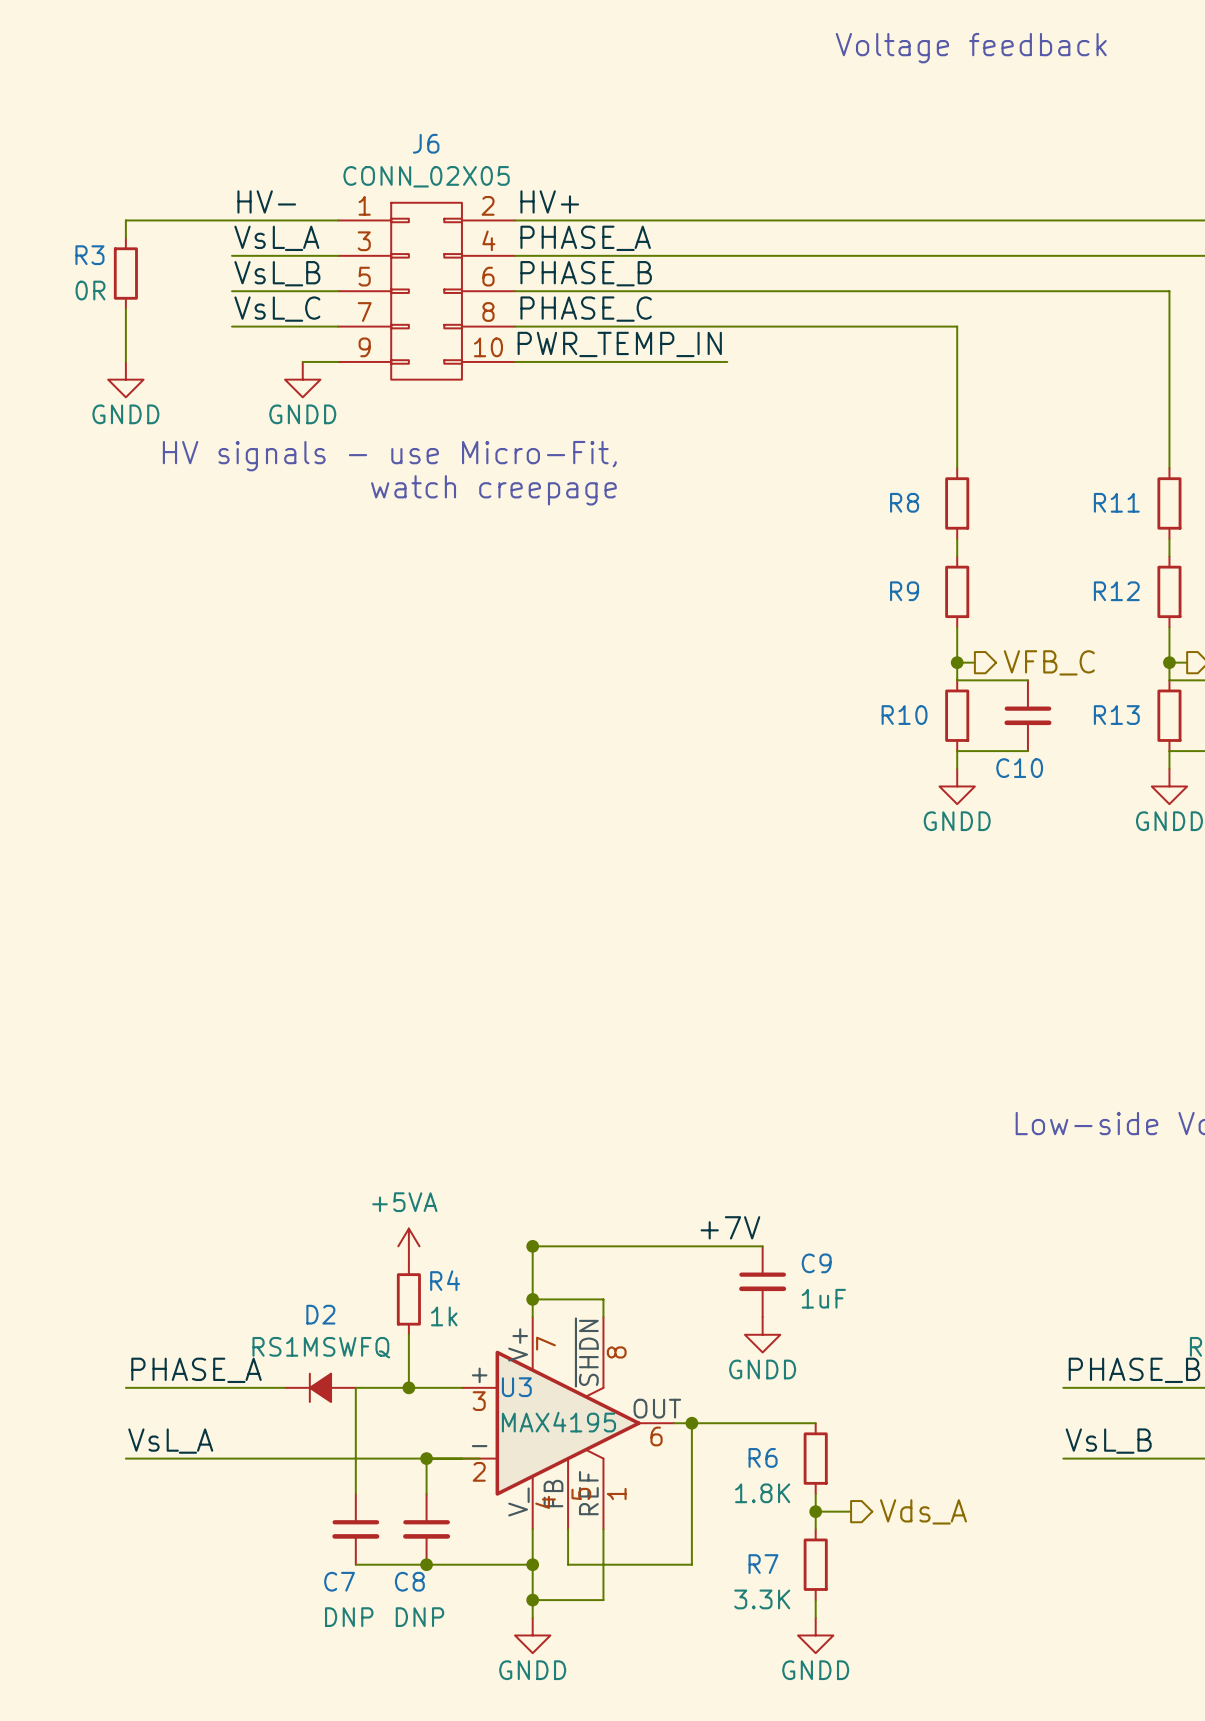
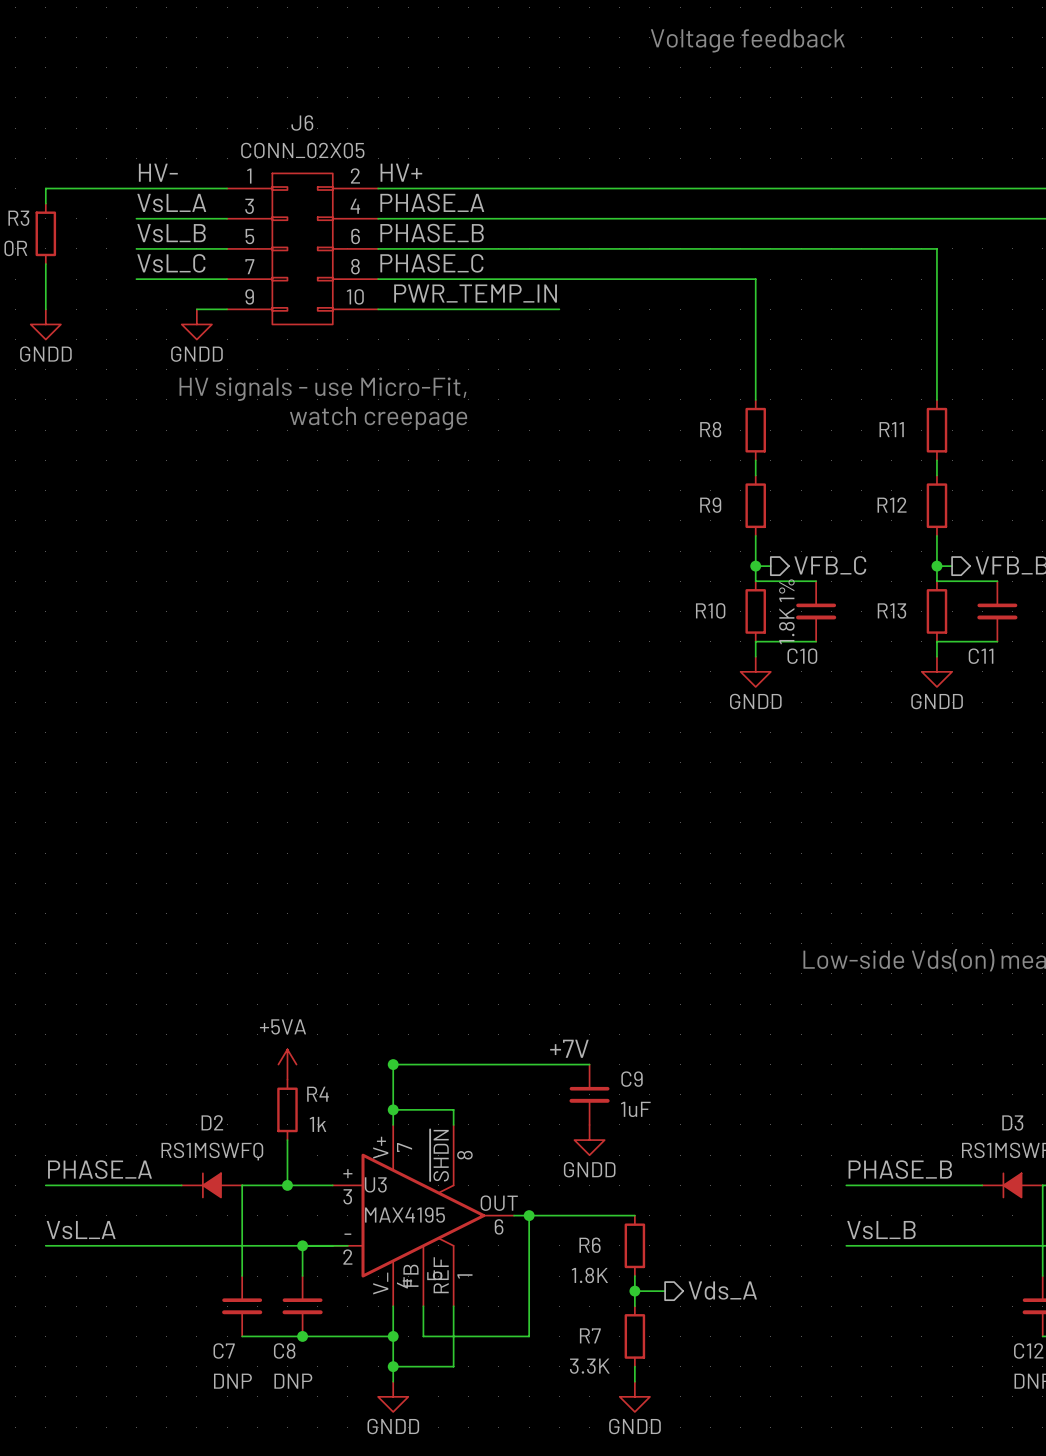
R10 value: none -> 1.8K 1% (786, 611)

